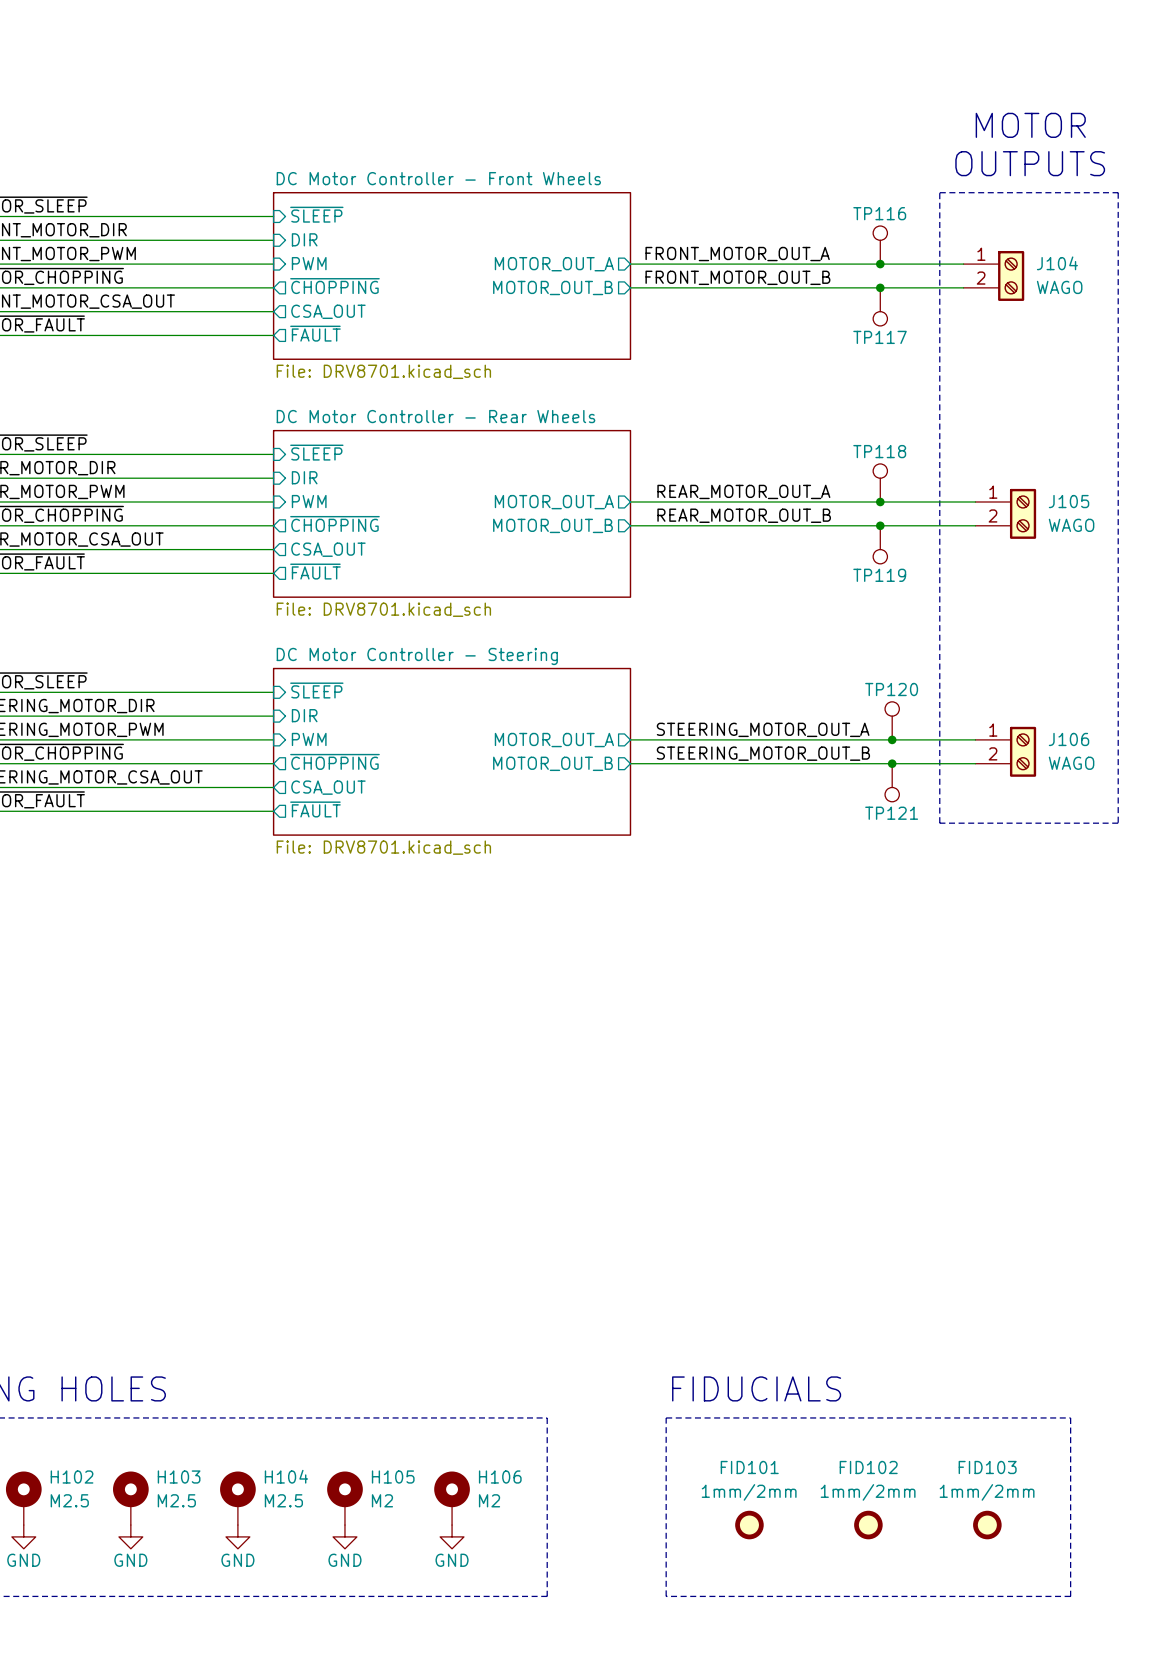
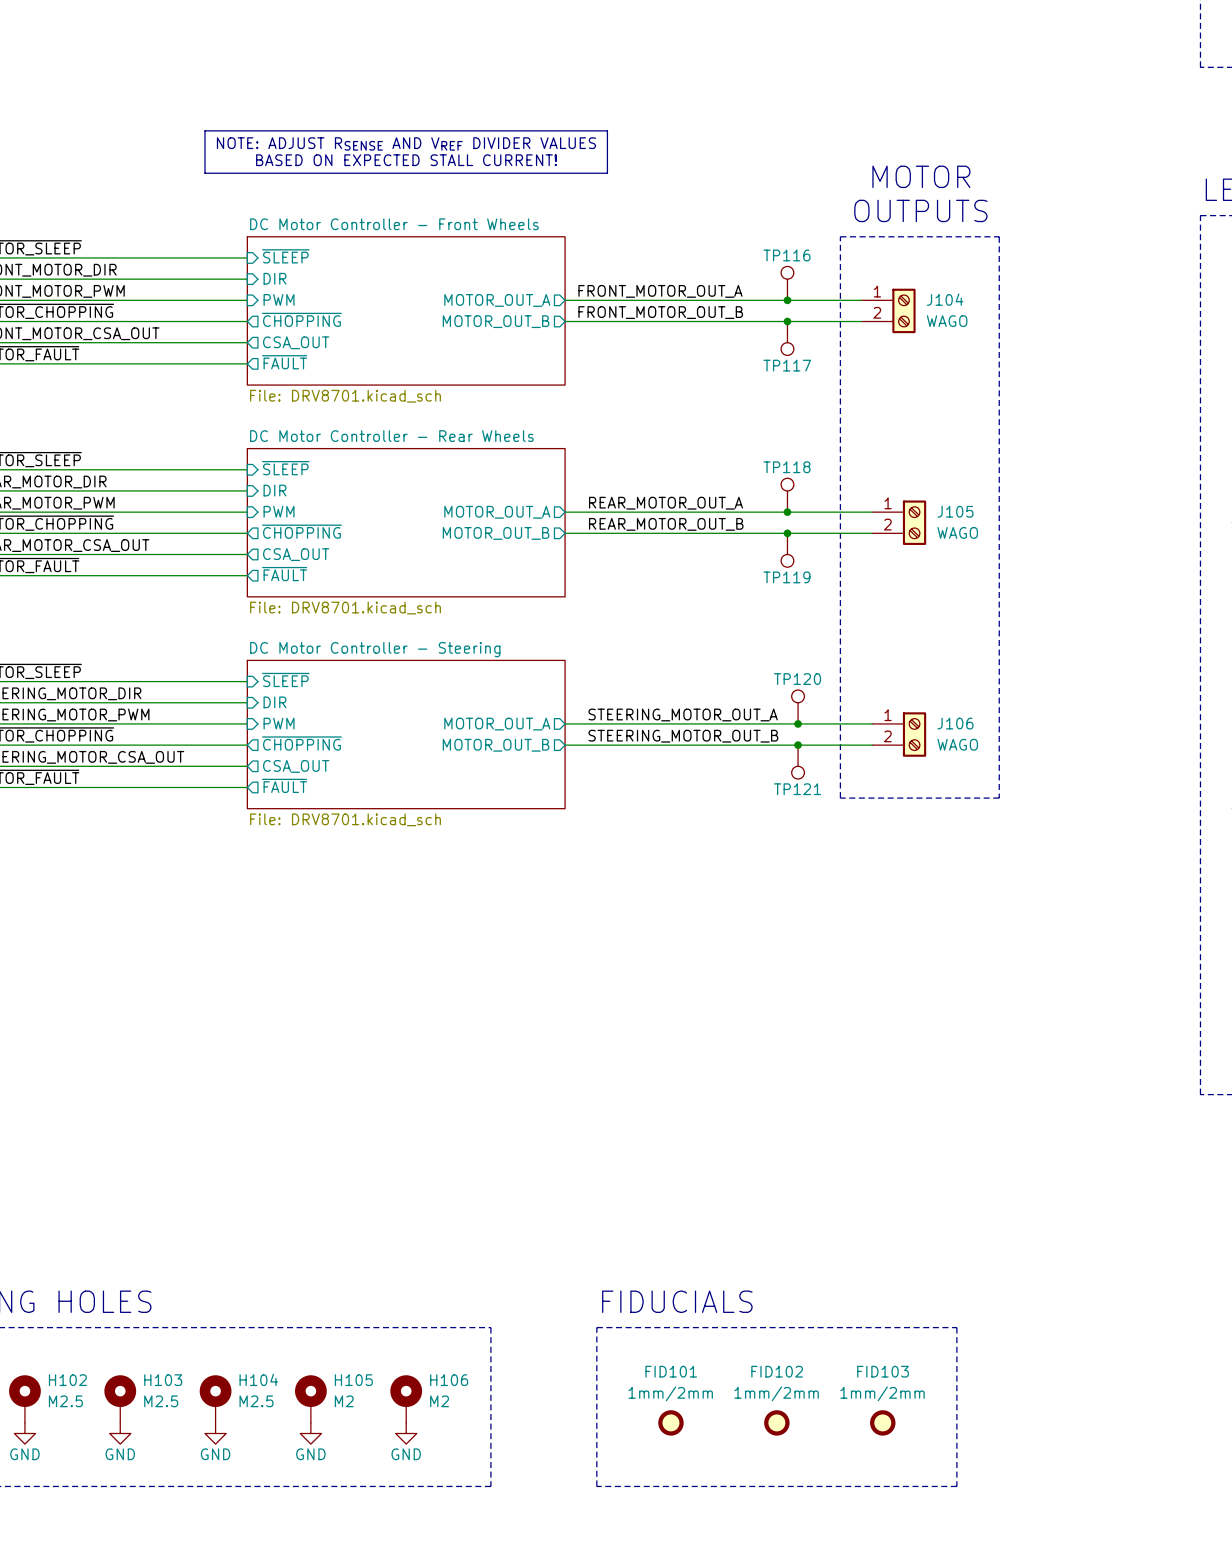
line: none -> (204, 130) (607, 130) (607, 173) (204, 173) (204, 130)
text: none -> NOTE: ADJUST RSENSE AND VREF DIVIDER VALUES (406, 143)
text: none -> BASED ON EXPECTED STALL CURRENT! (406, 160)

